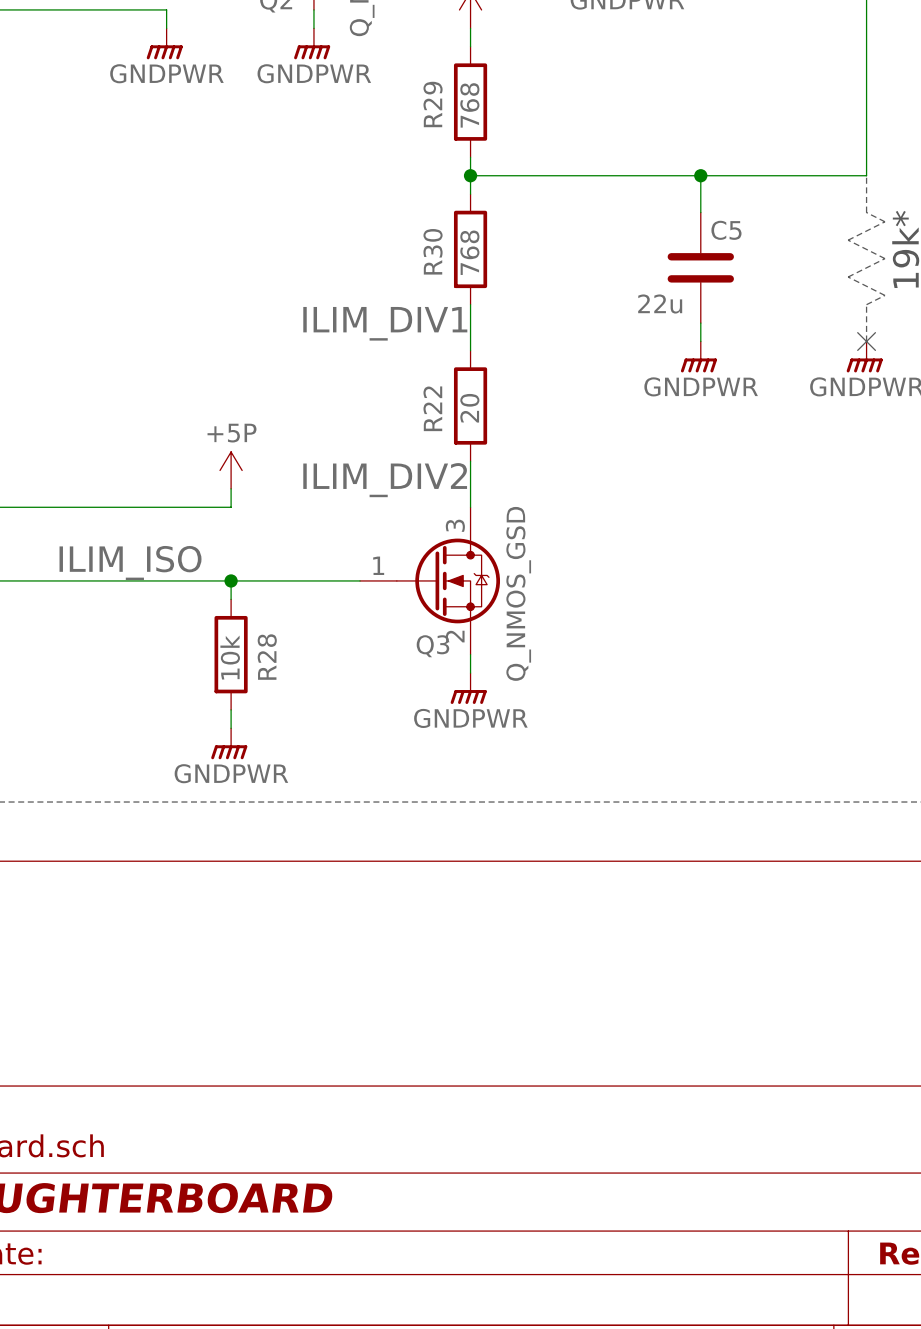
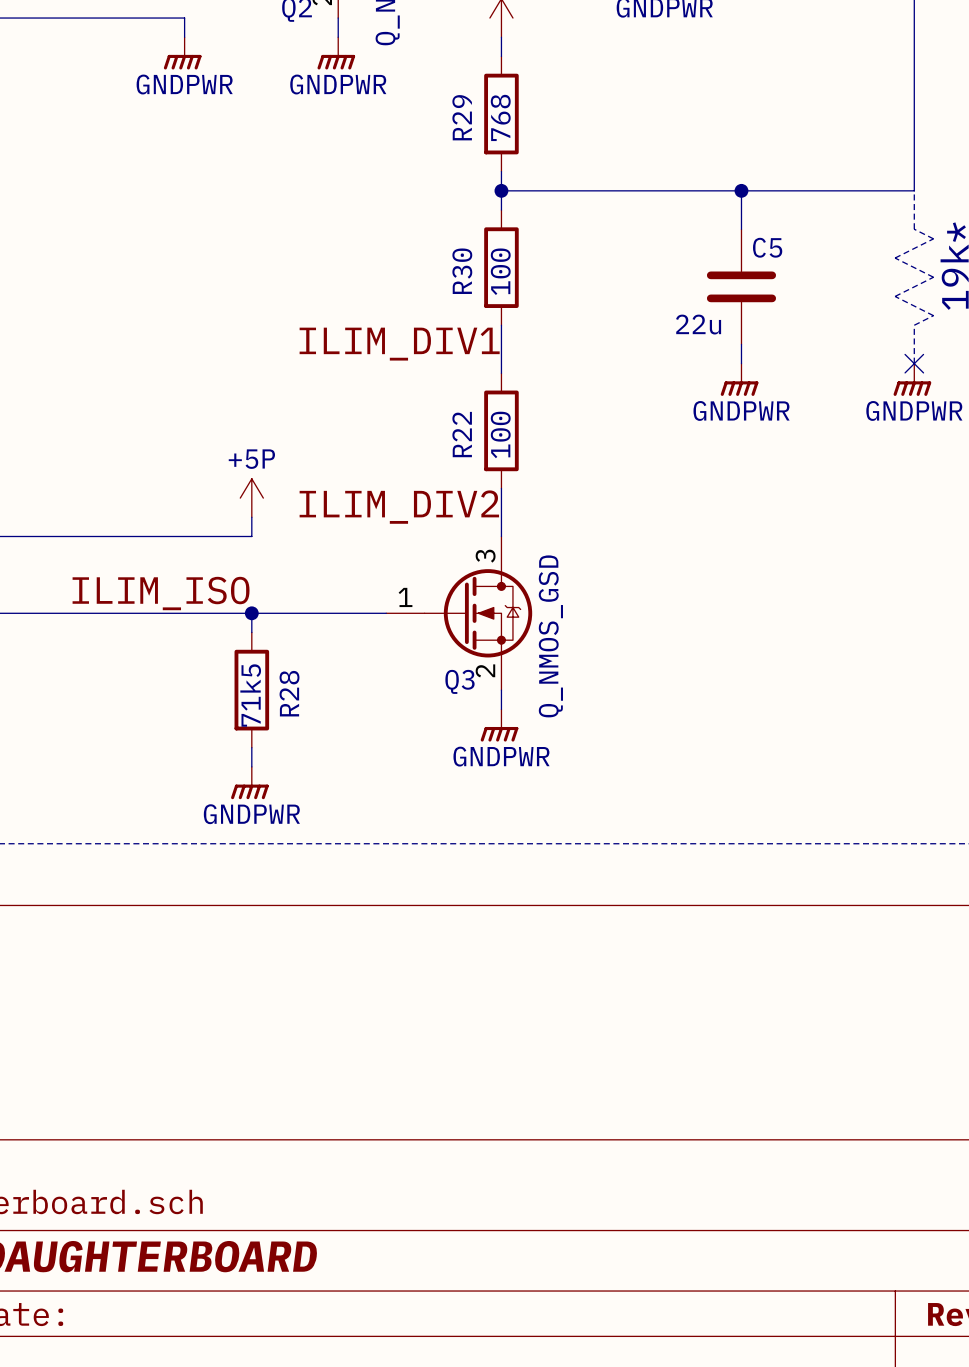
R30 value: 768 (469, 252) -> 100 (500, 271)
R22 value: 20 (469, 408) -> 100 (500, 434)
R28 value: 10k (230, 657) -> 71k5 (250, 695)

